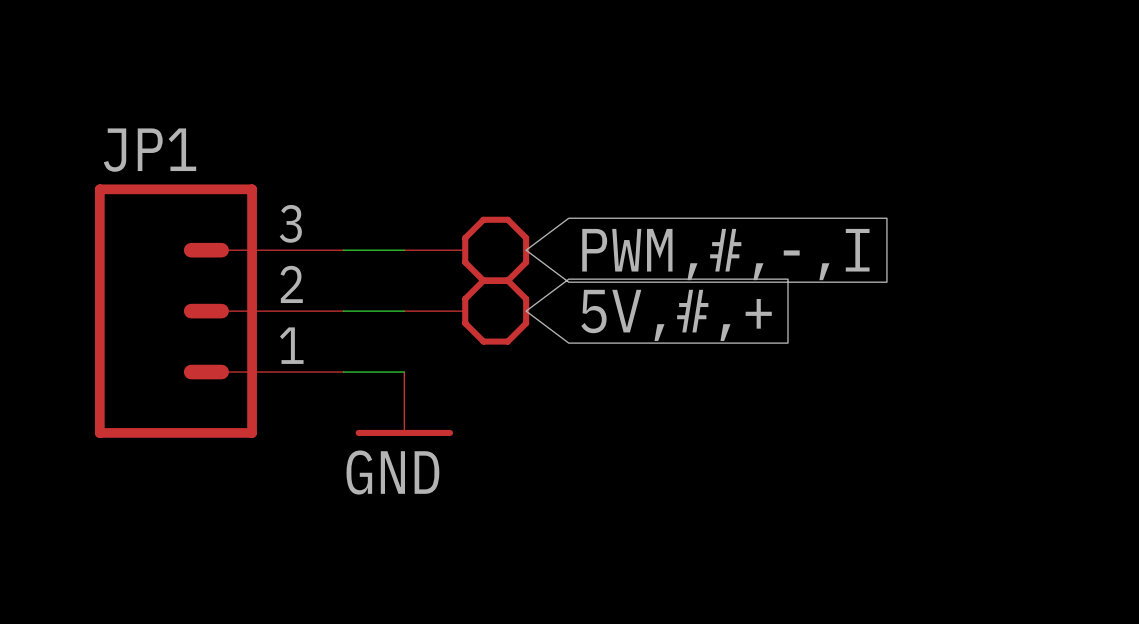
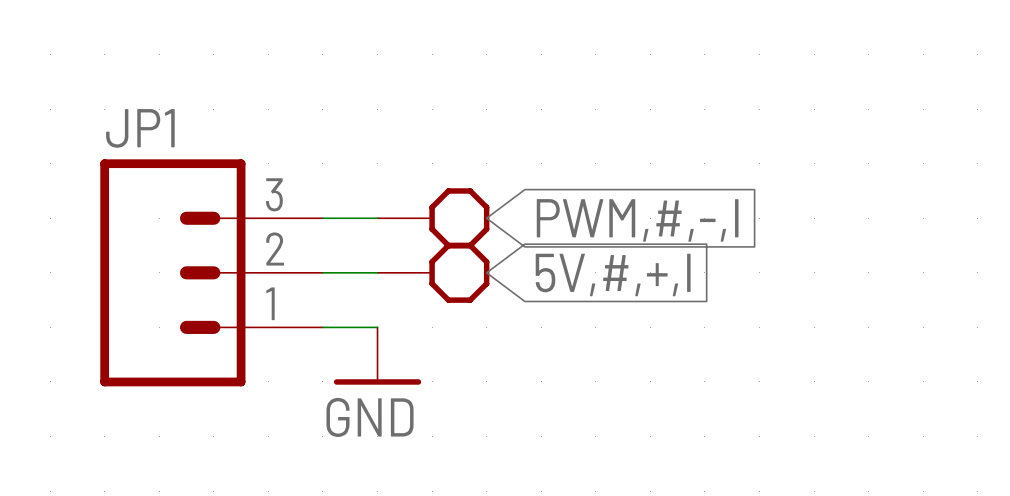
global label: 5V,#,+ (676, 315) -> 5V,#,+,I (613, 274)

